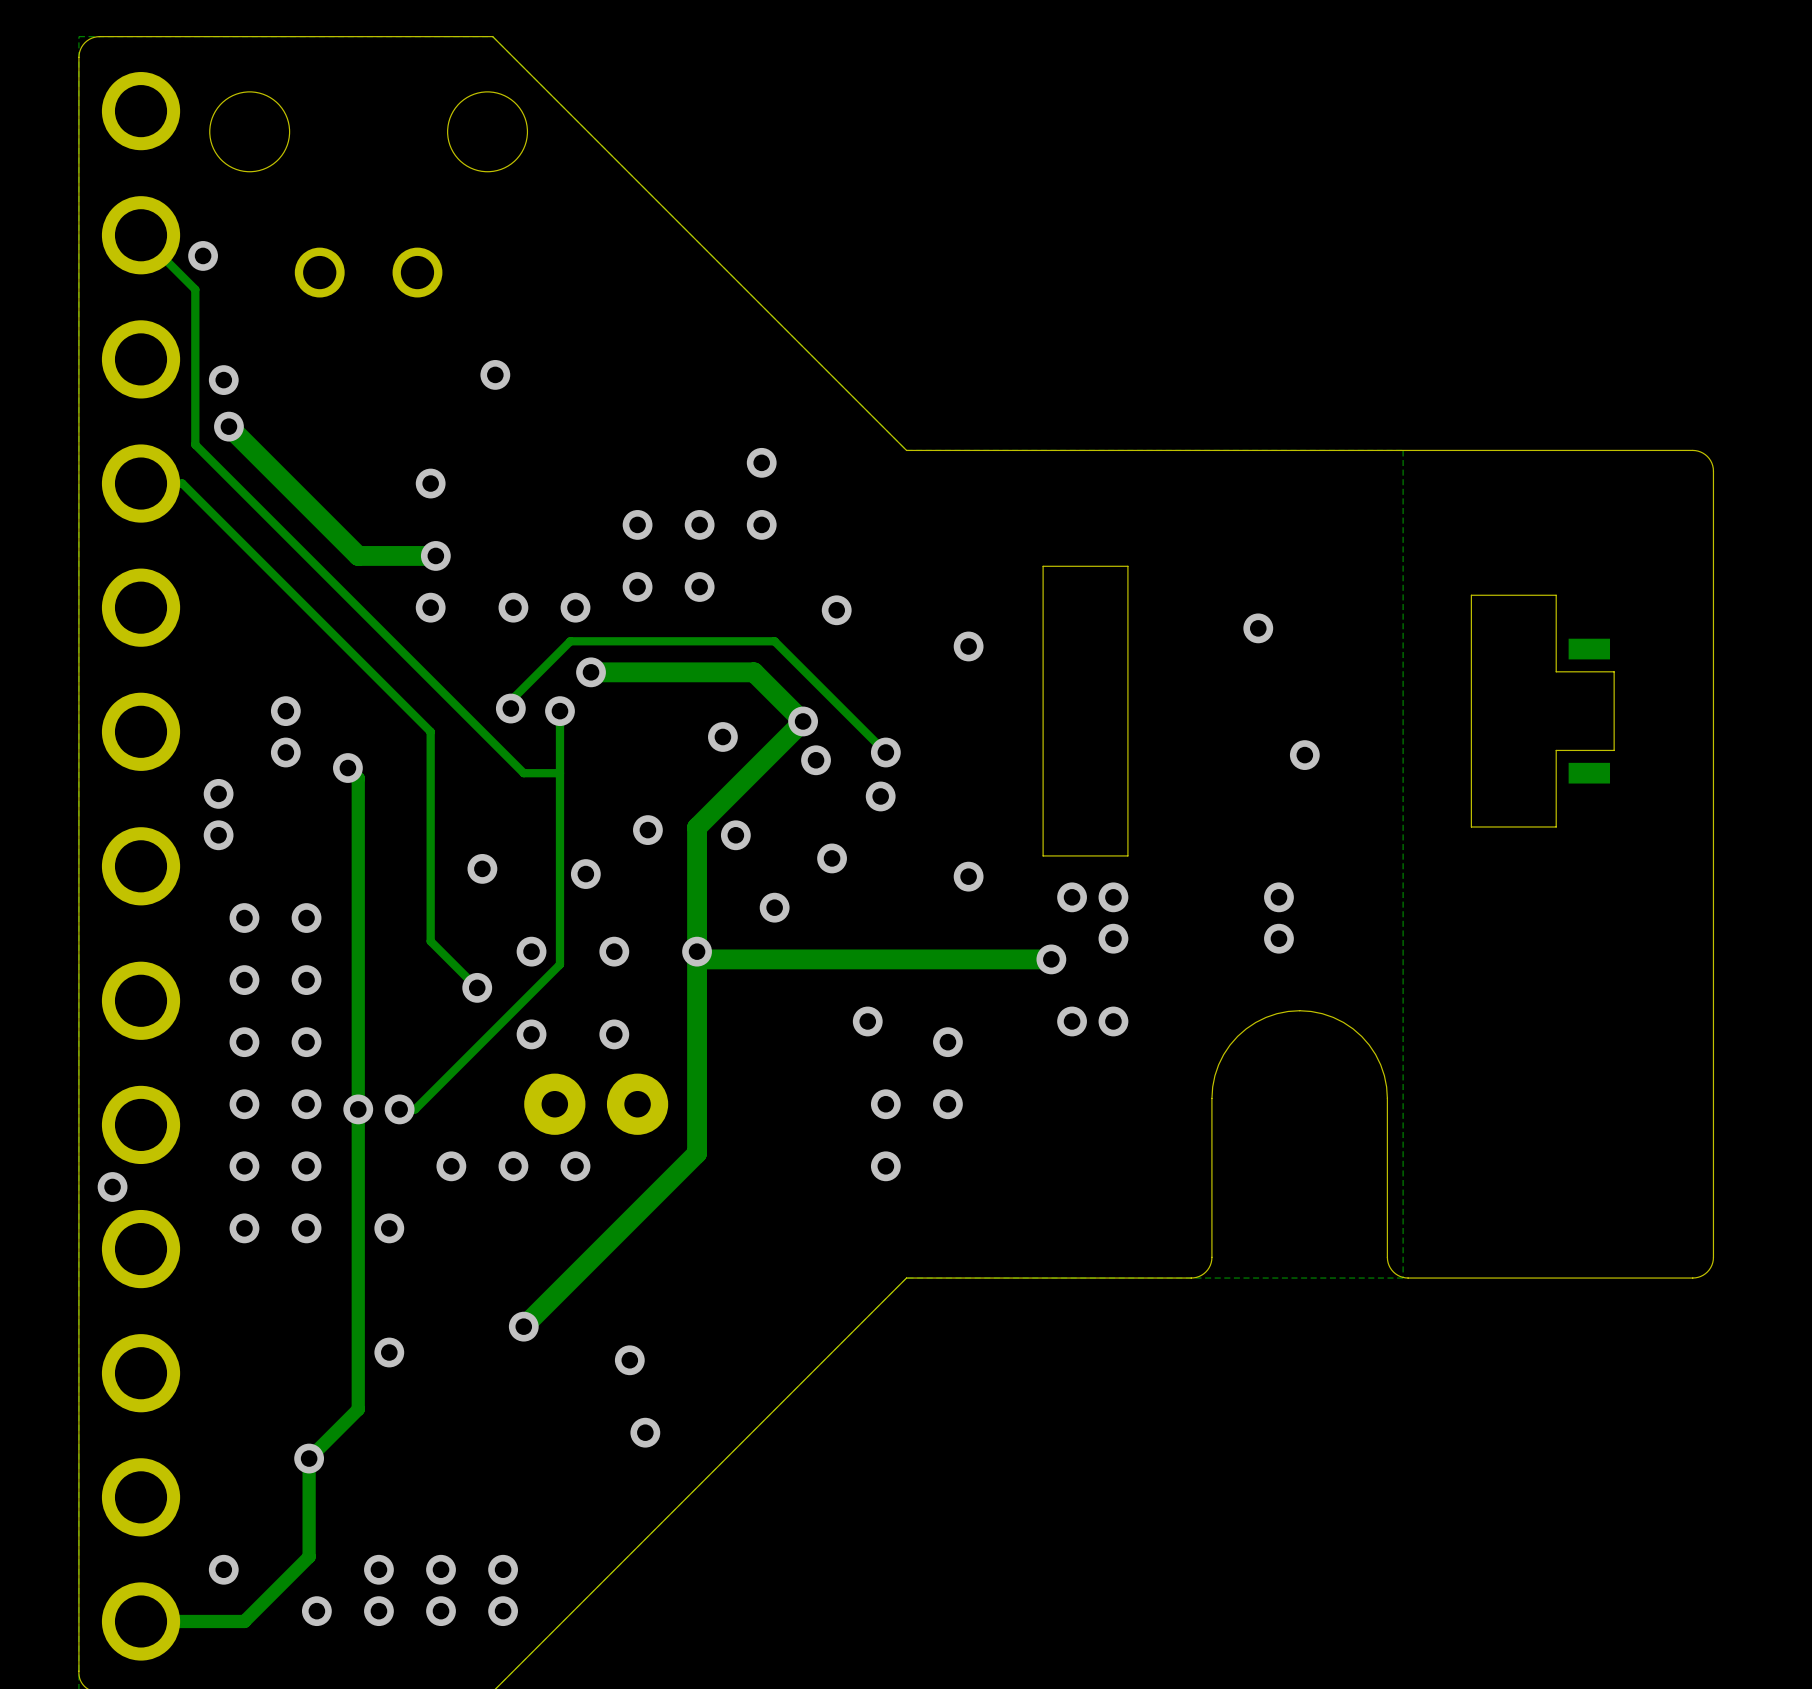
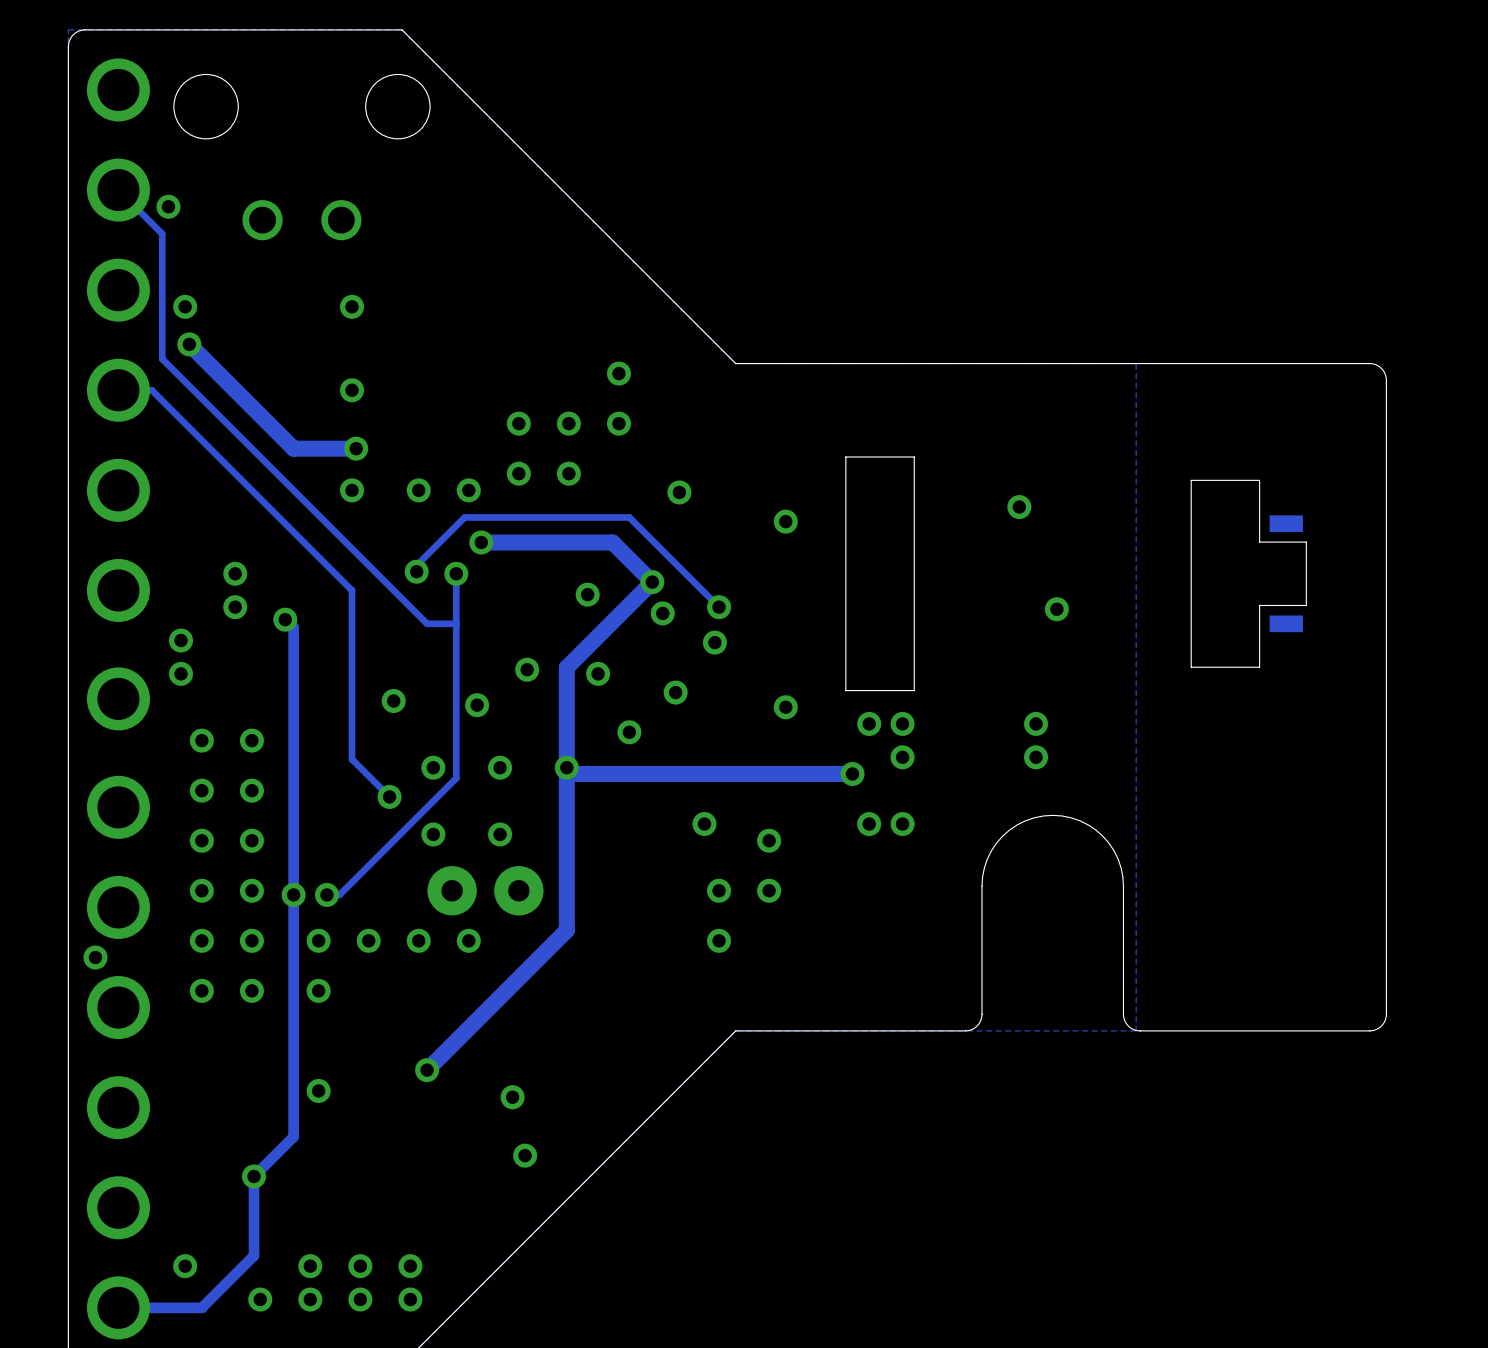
via position: (495, 374) -> (352, 306)
via: none -> (318, 940)

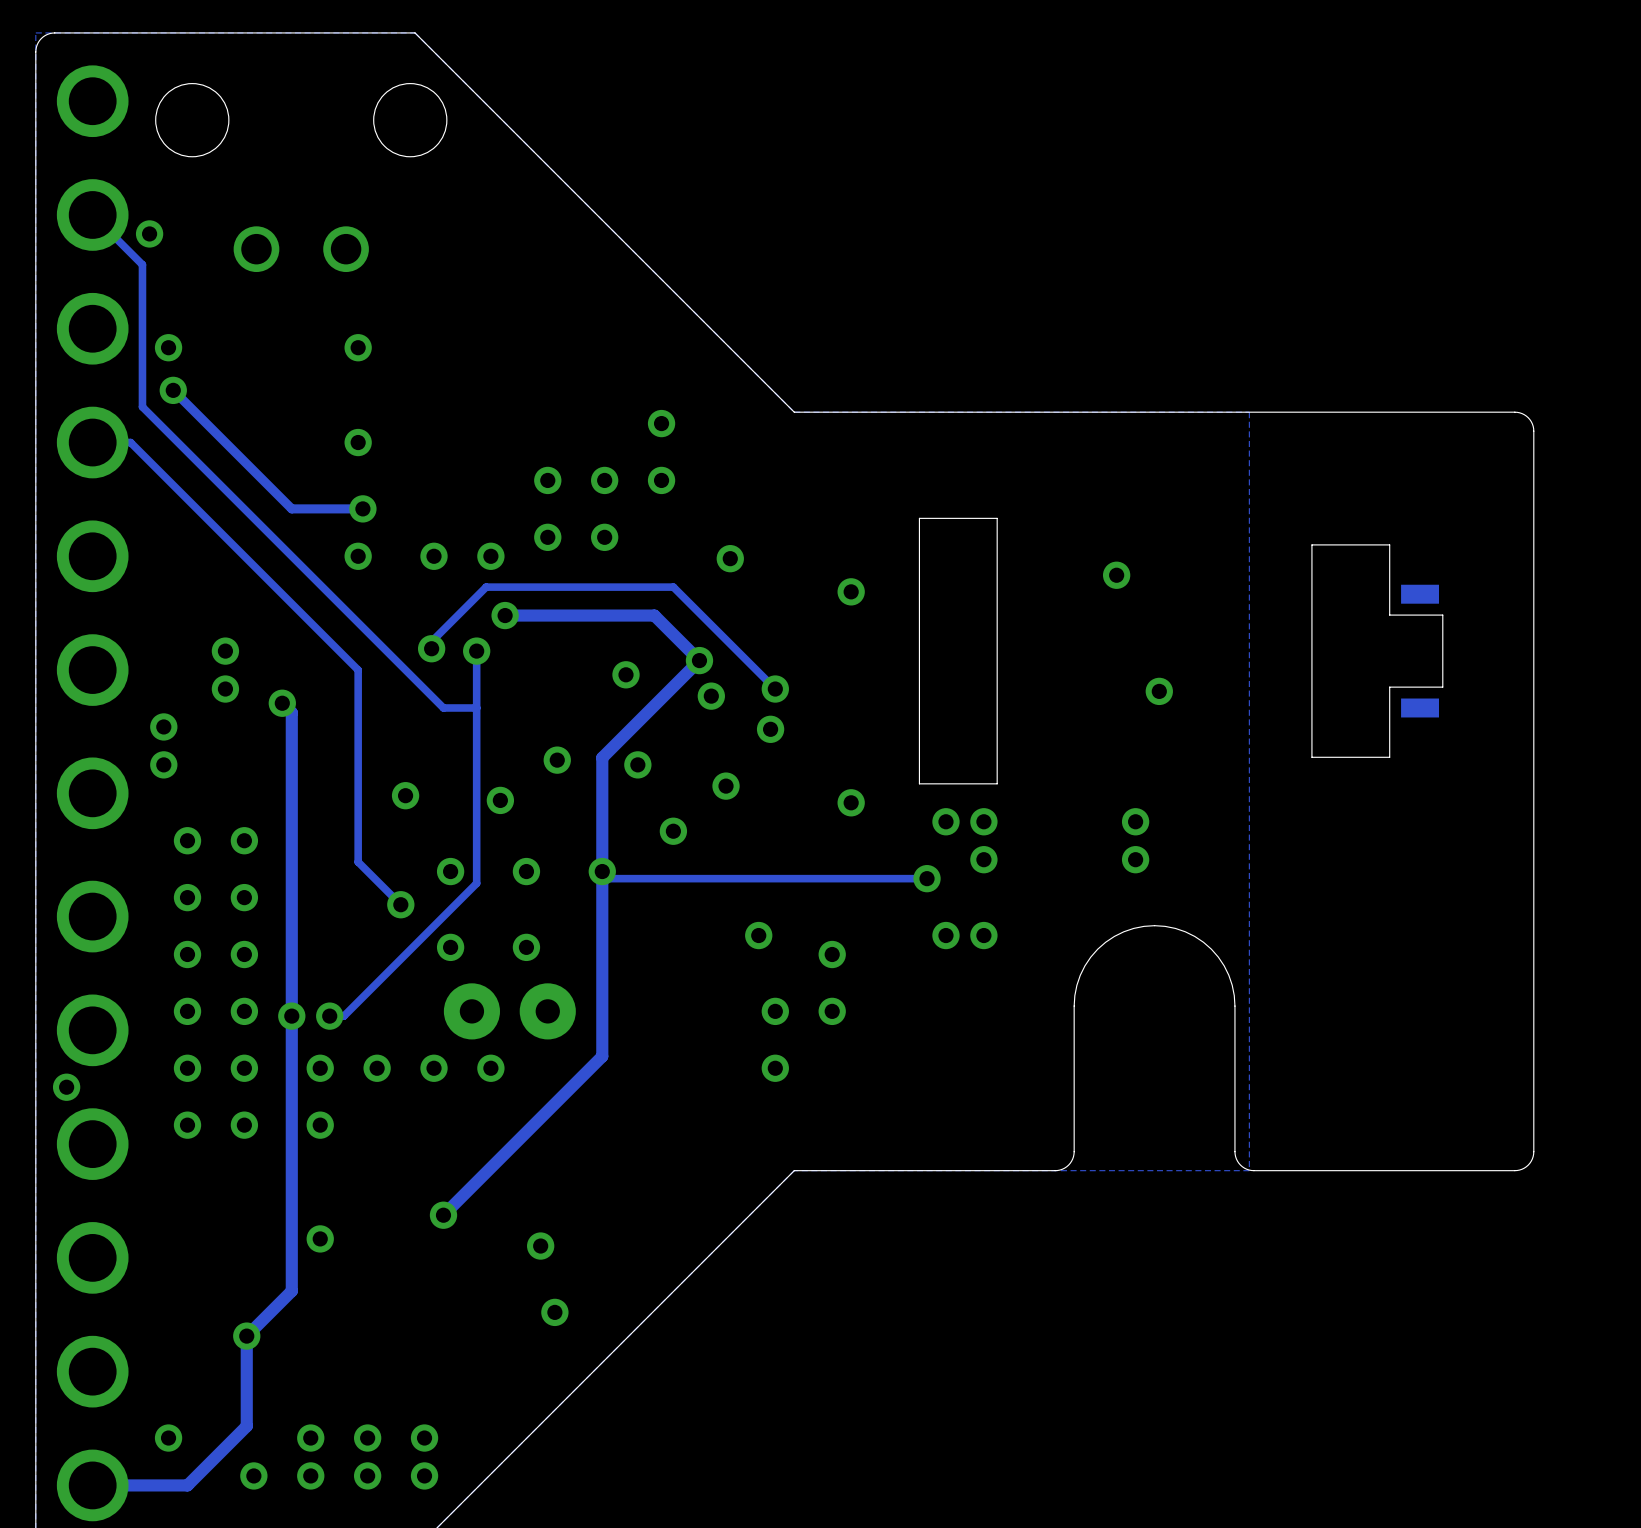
track width: thick (189, 344) (293, 448) (356, 448) -> thin (173, 390) (291, 508) (362, 508)
track width: thick (481, 542) (612, 542) (652, 582) (566, 667) (566, 767) -> thin (505, 615) (654, 615) (699, 660) (602, 757) (602, 871)
track width: thick (852, 773) (566, 773) (566, 930) (427, 1070) -> thin (927, 878) (602, 878) (602, 1056) (443, 1215)

